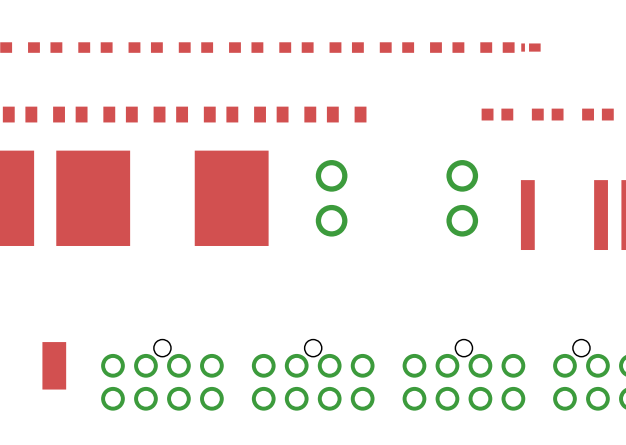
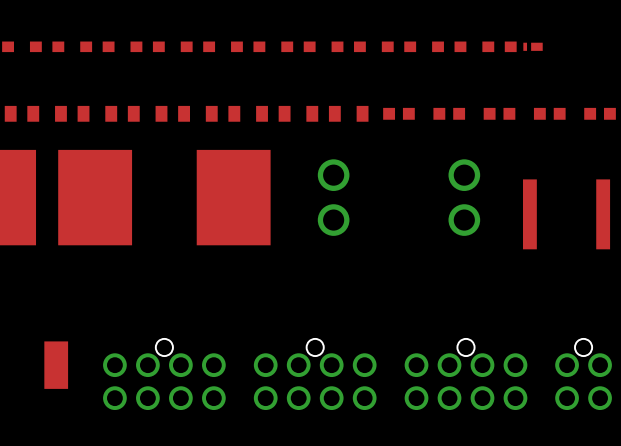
part: none -> (398, 113)
part: none -> (449, 113)

